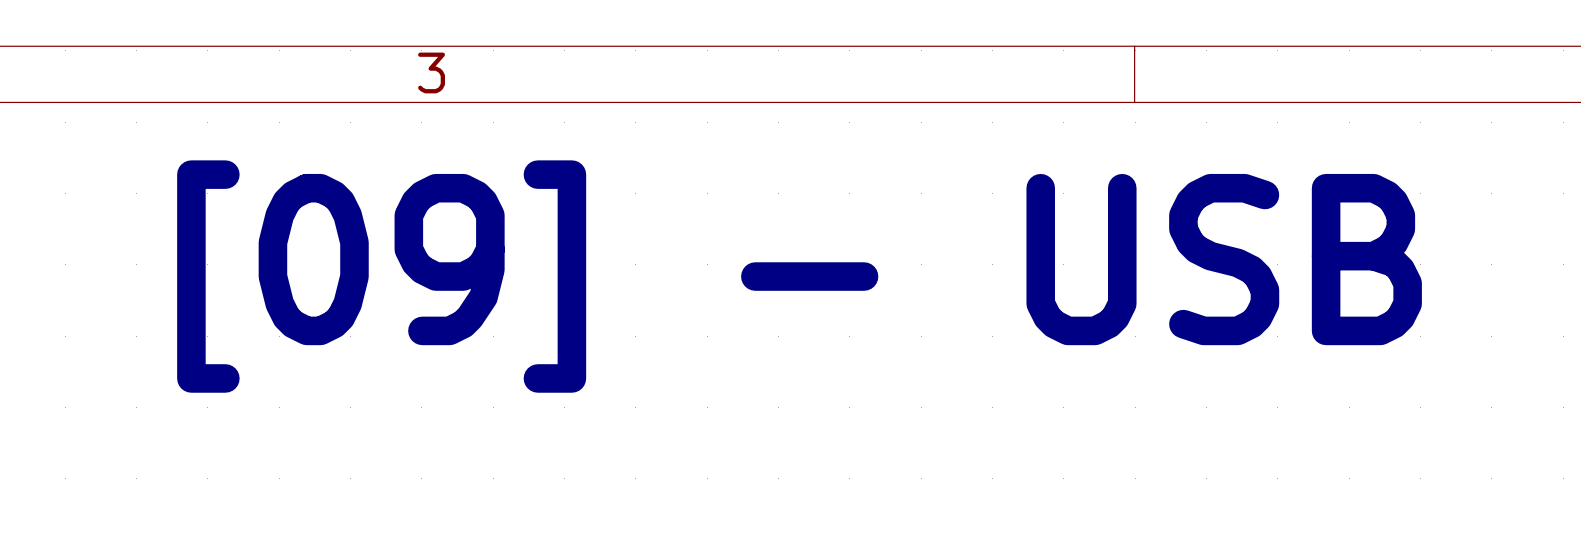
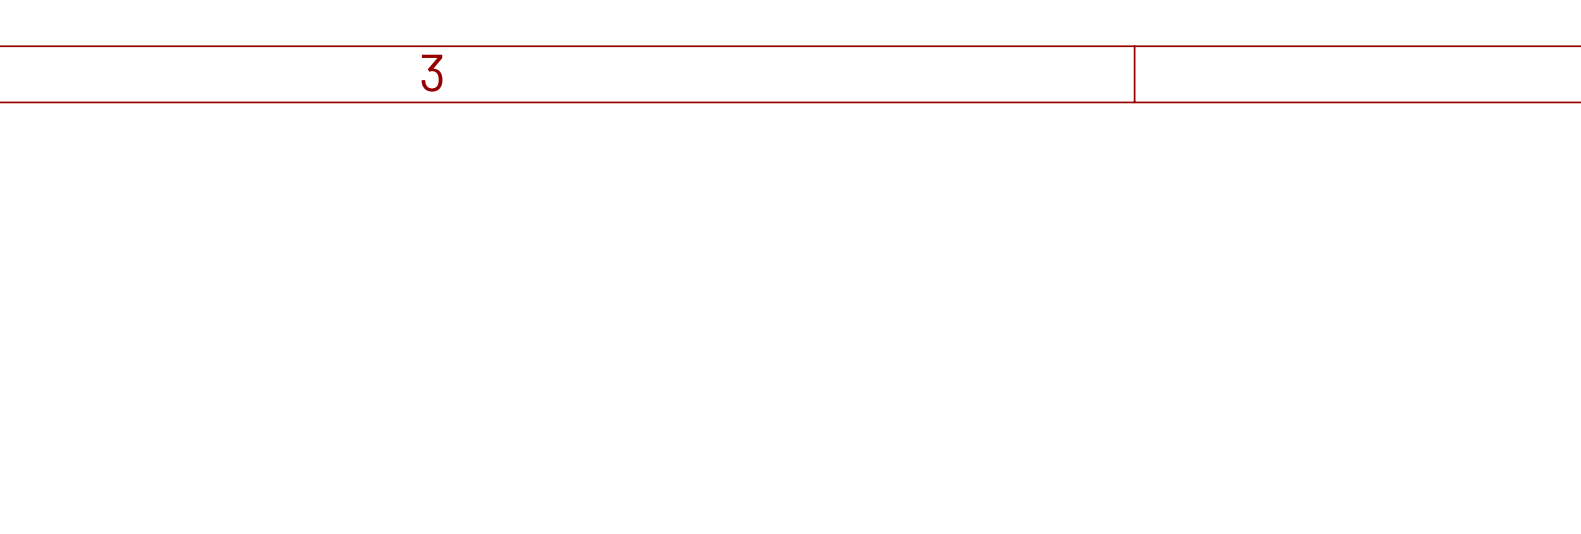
text: [09] - USB (799, 276) -> none

